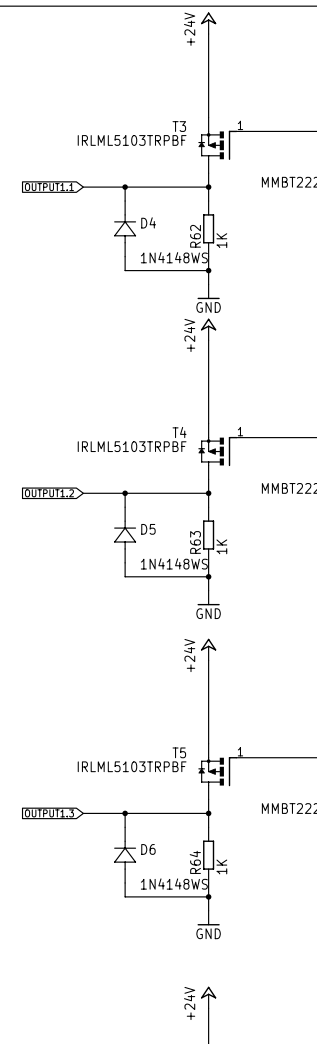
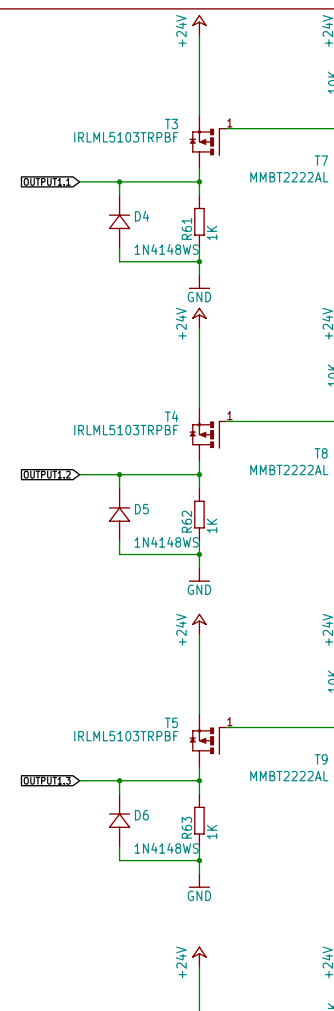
R62 name: R62 (195, 236) -> R61 (186, 228)
R63 name: R63 (195, 542) -> R62 (186, 521)
R64 name: R64 (195, 862) -> R63 (186, 827)

